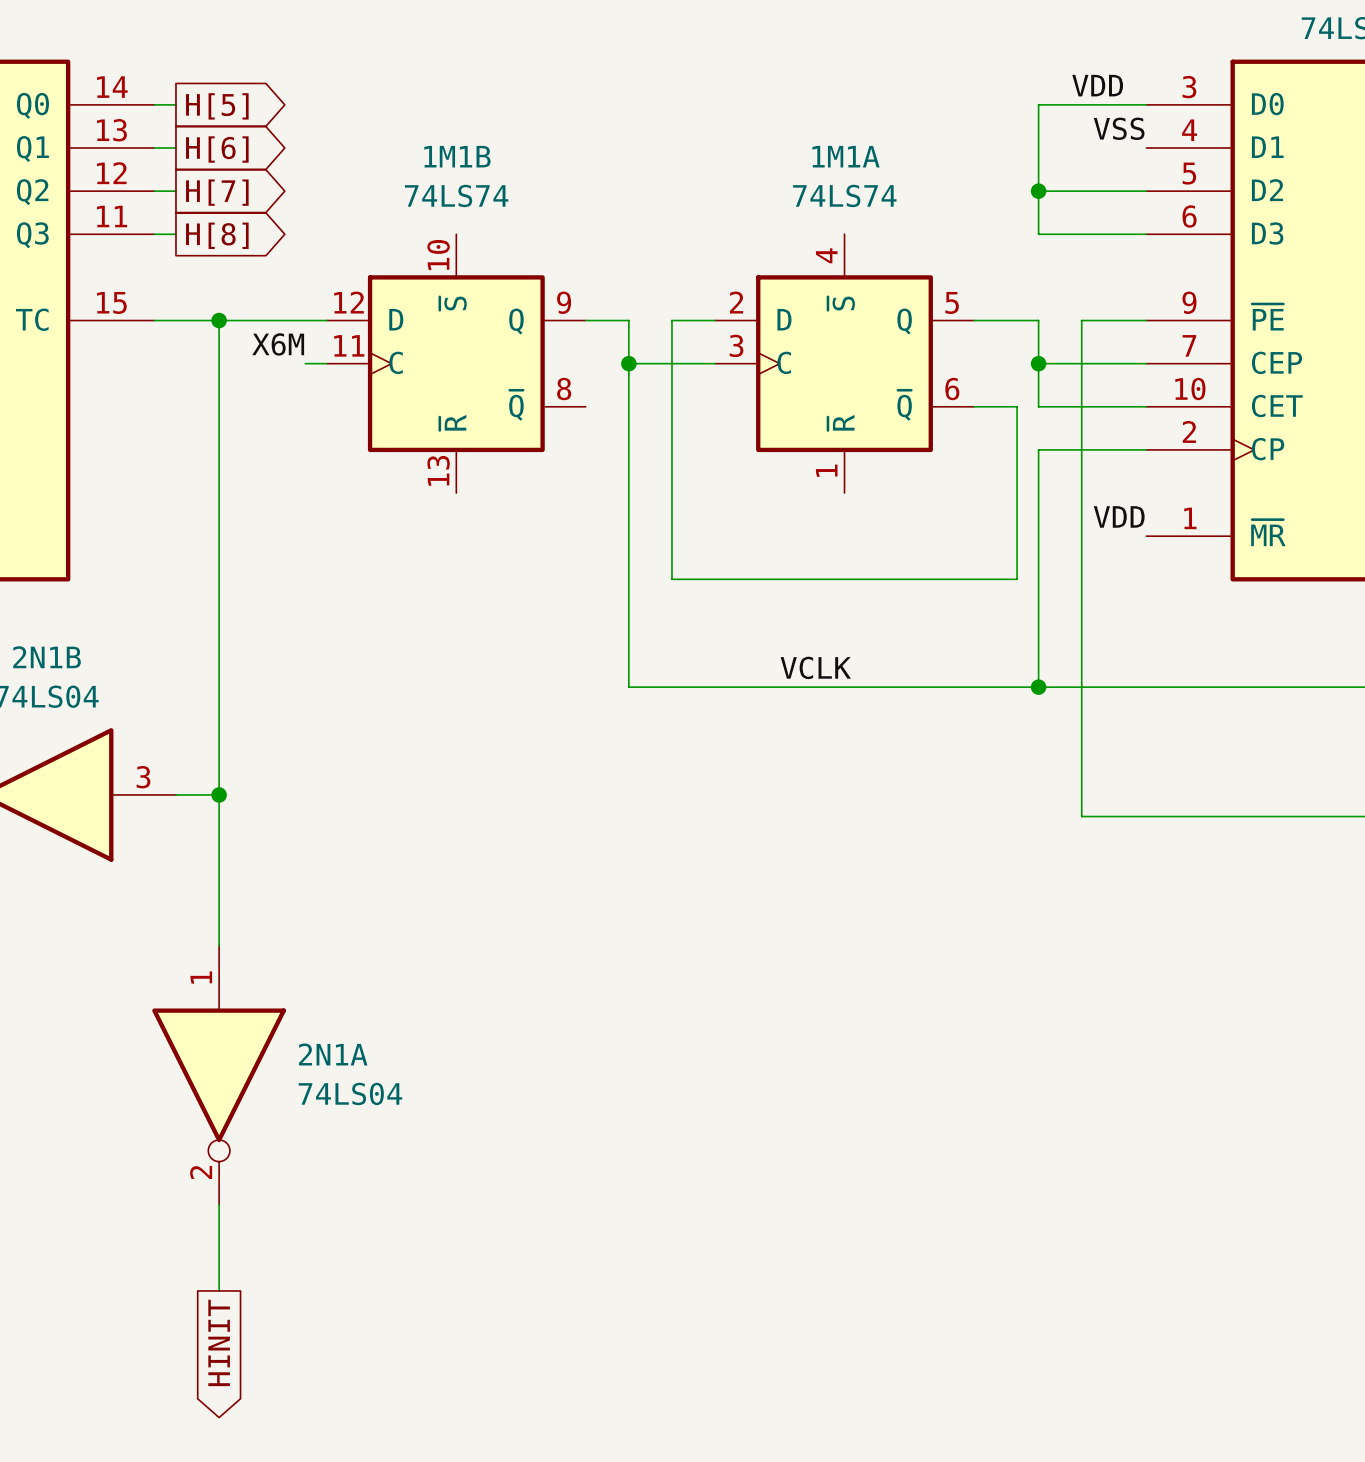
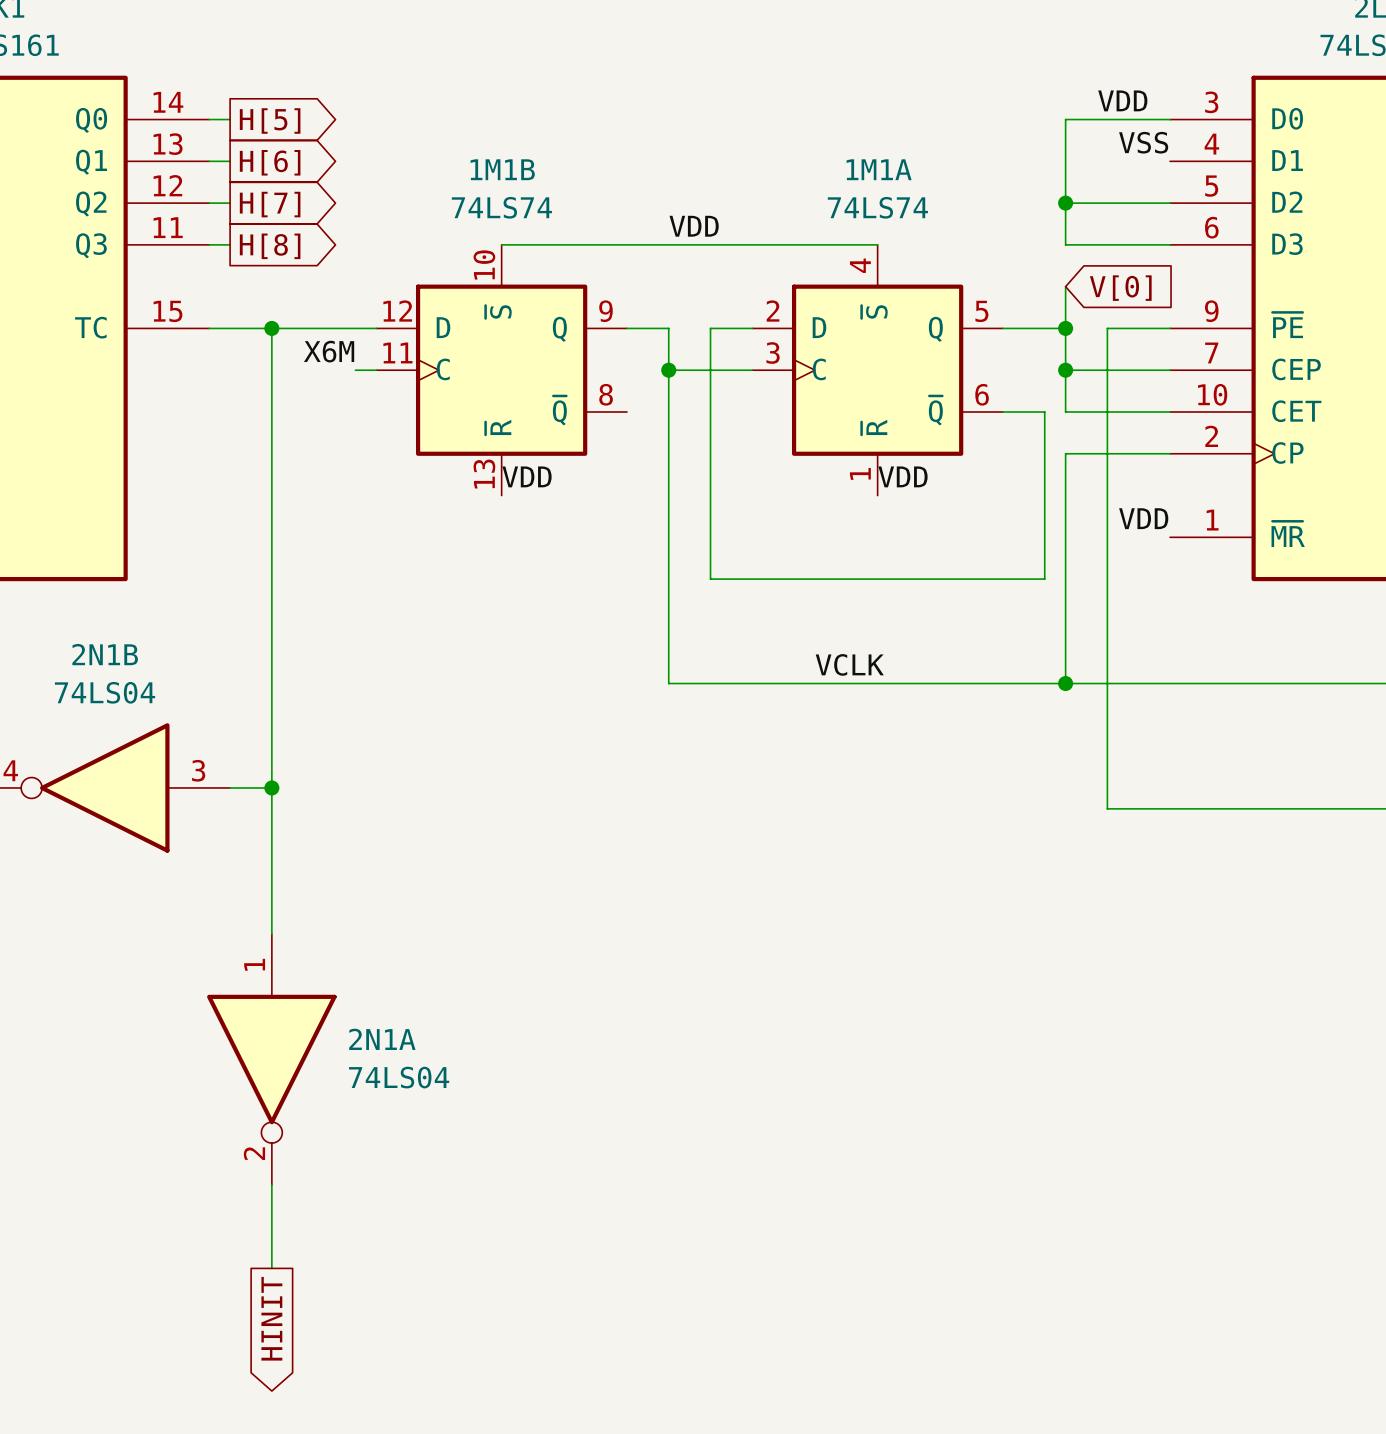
label: none -> VDD (694, 226)
wire: none -> (501, 244) (877, 244)
wire: none -> (1065, 286) (1065, 328)
global label: none -> V[0] (1120, 288)
junction: none -> (1065, 328)
label: none -> VDD (527, 476)
label: none -> VDD (903, 476)

